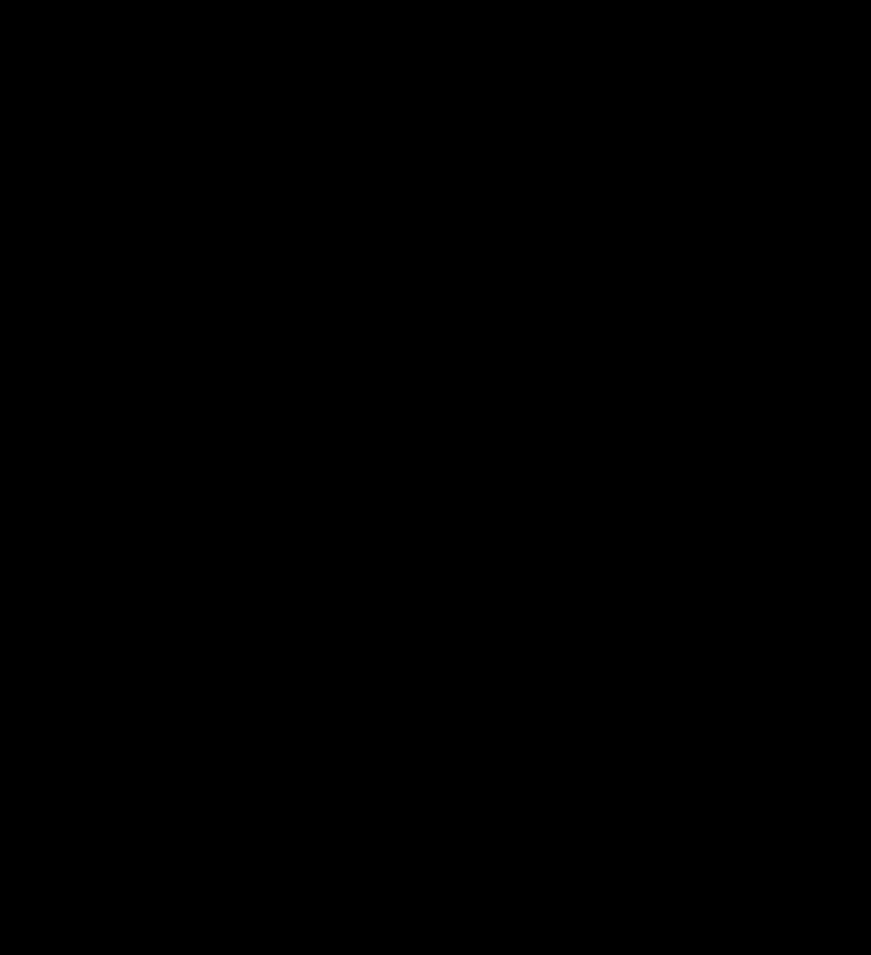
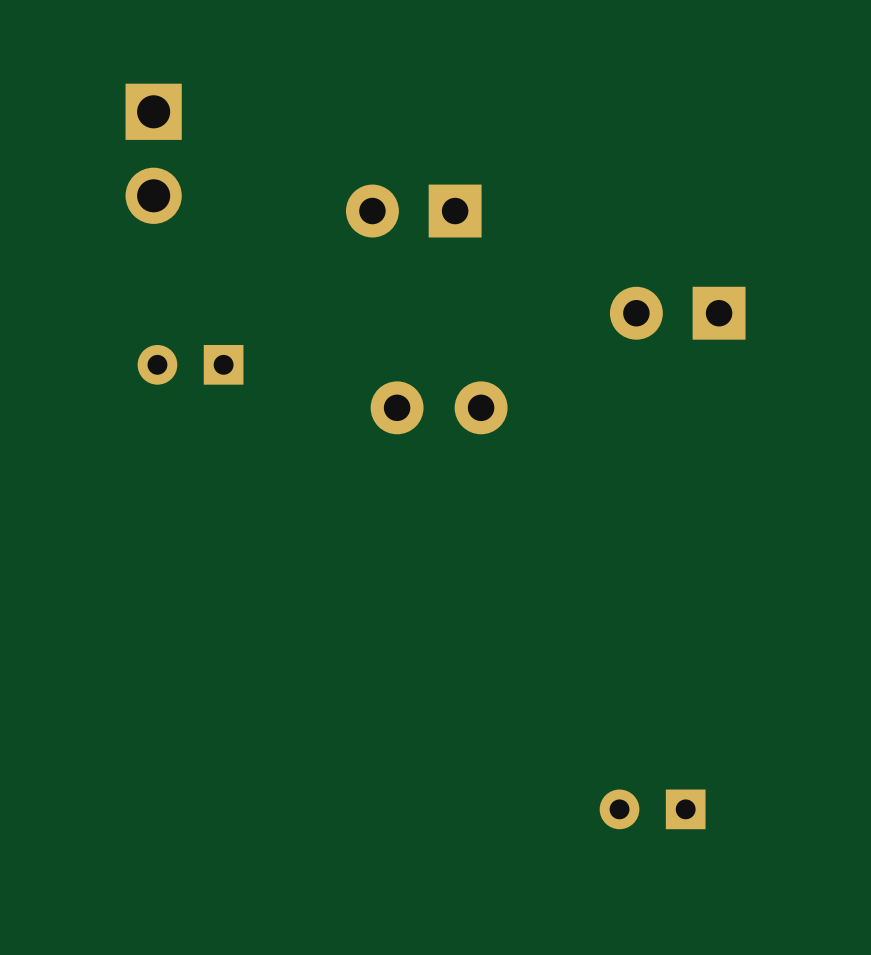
part: none -> (153, 153)
part: none -> (413, 211)
part: none -> (677, 313)
part: none -> (190, 364)
part: none -> (439, 407)
part: none -> (652, 809)

